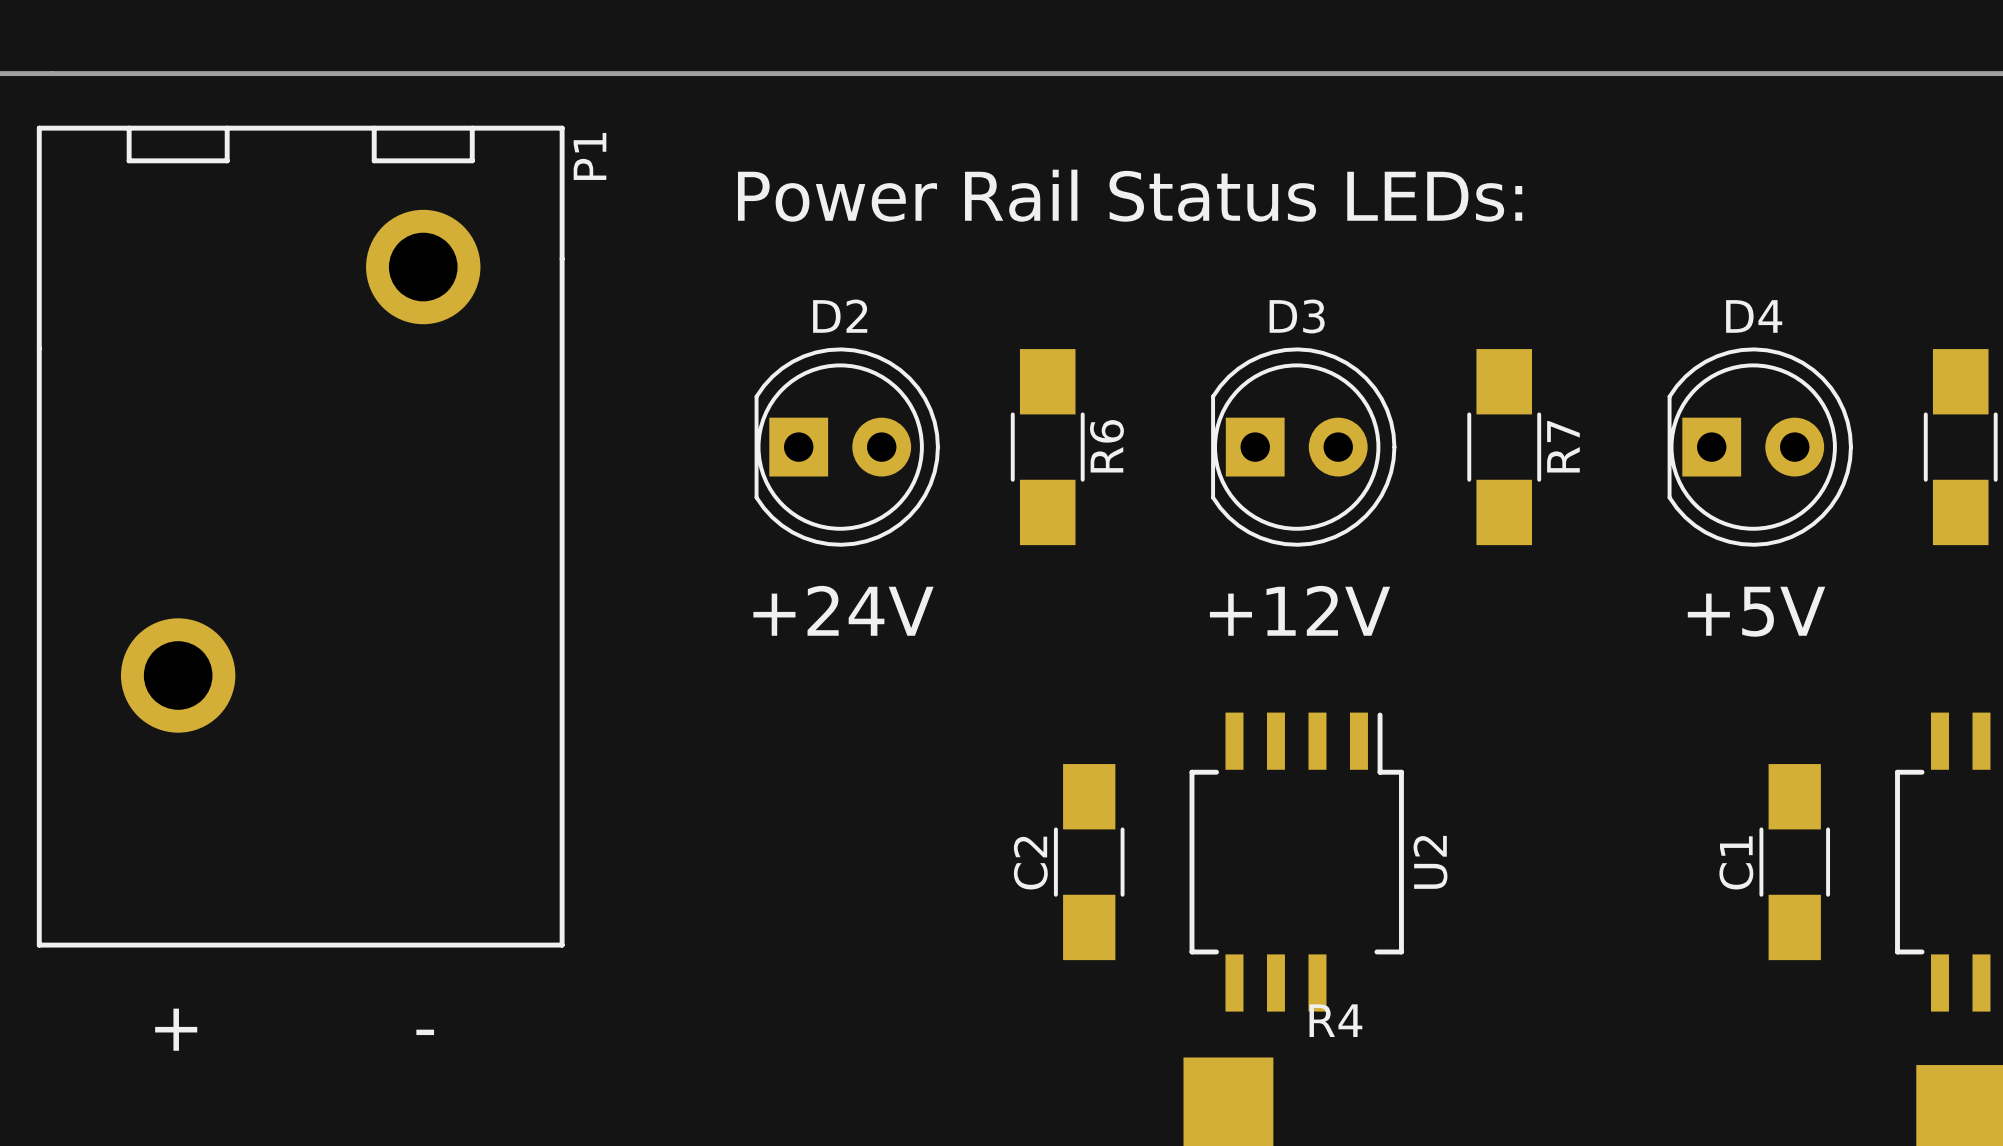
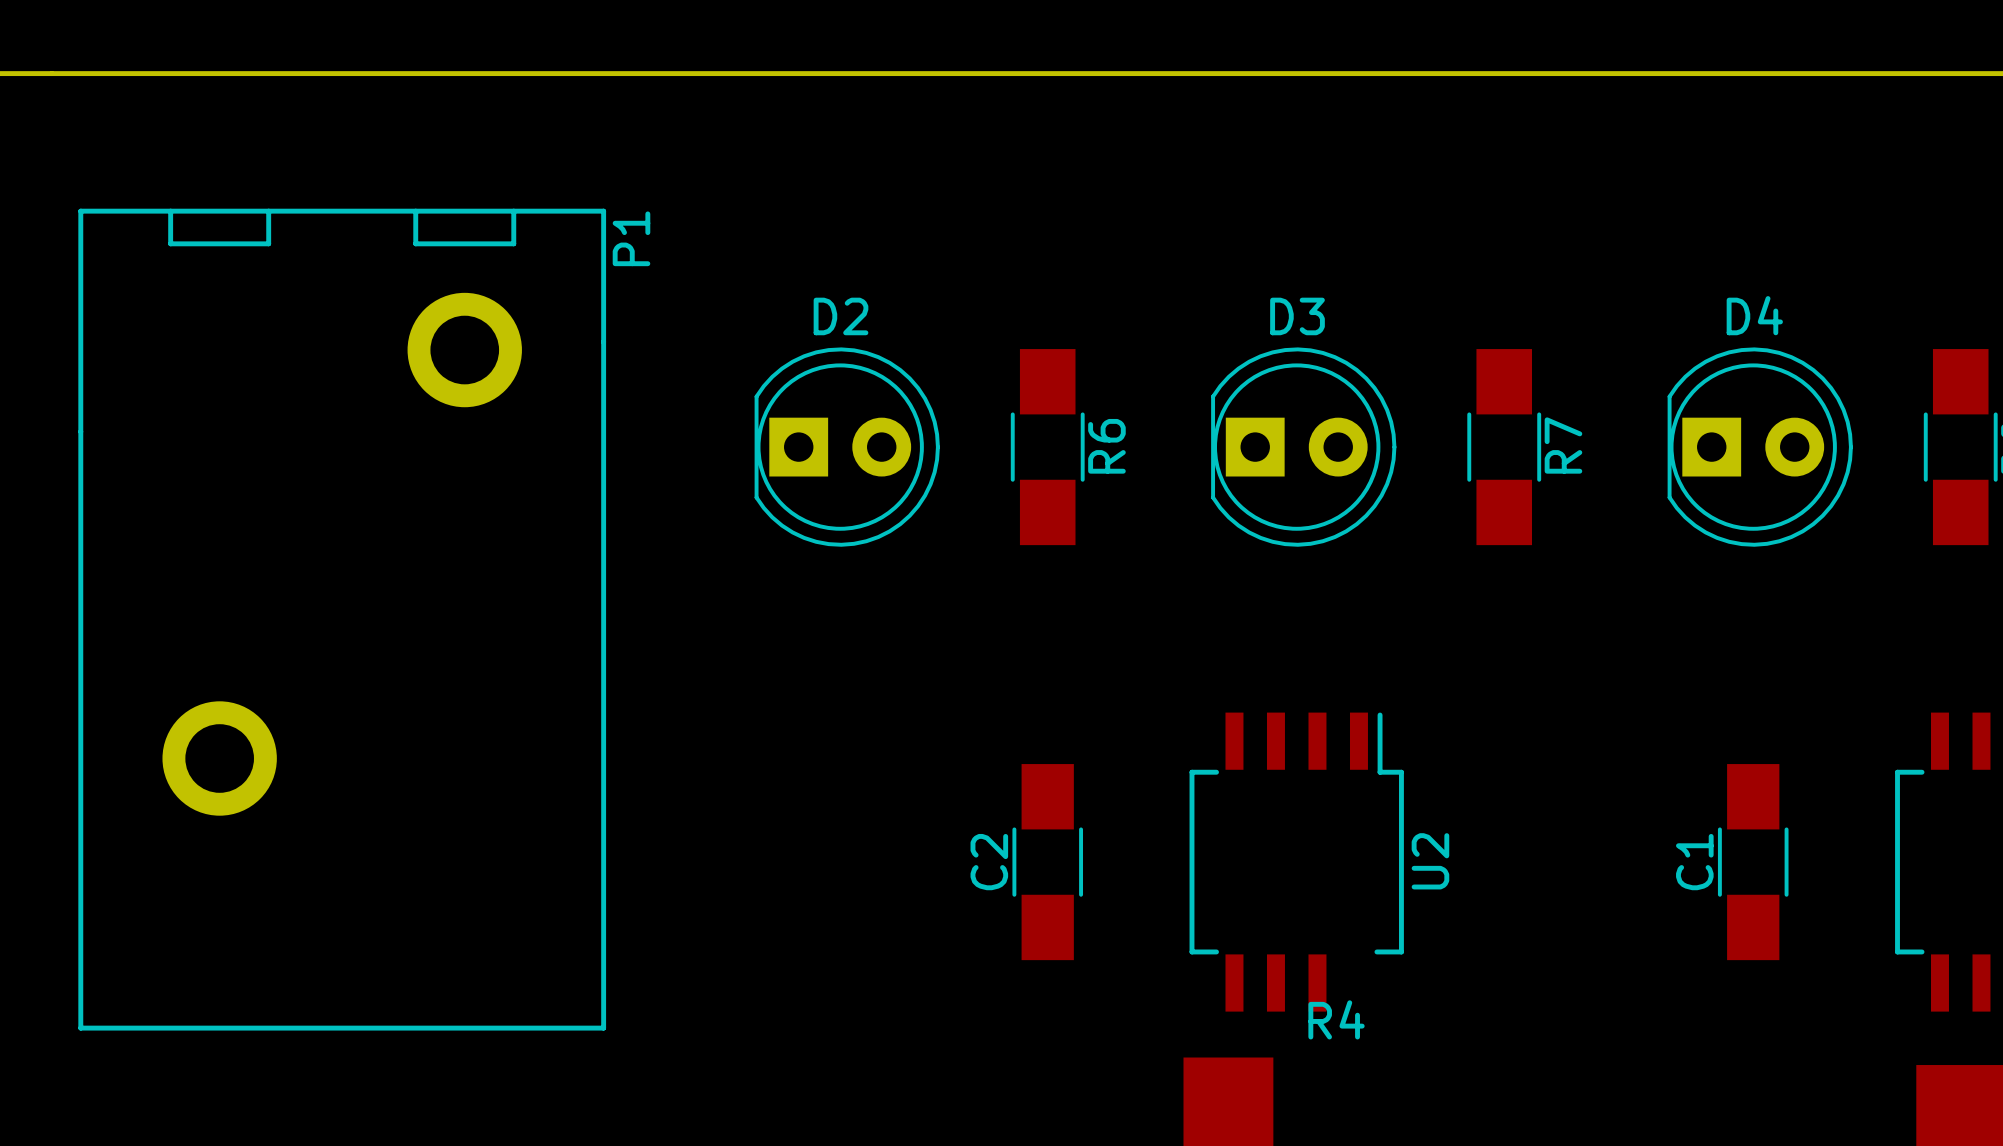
text: Power Rail Status LEDs: (1130, 195) -> none
P1 position: (300, 536) -> (342, 619)
text: +24V (843, 610) -> none
text: +12V (1300, 610) -> none
text: +5V (1756, 611) -> none
C2 position: (1089, 862) -> (1047, 862)
C1 position: (1794, 862) -> (1753, 862)
text: + (176, 1029) -> none
text: - (425, 1032) -> none

